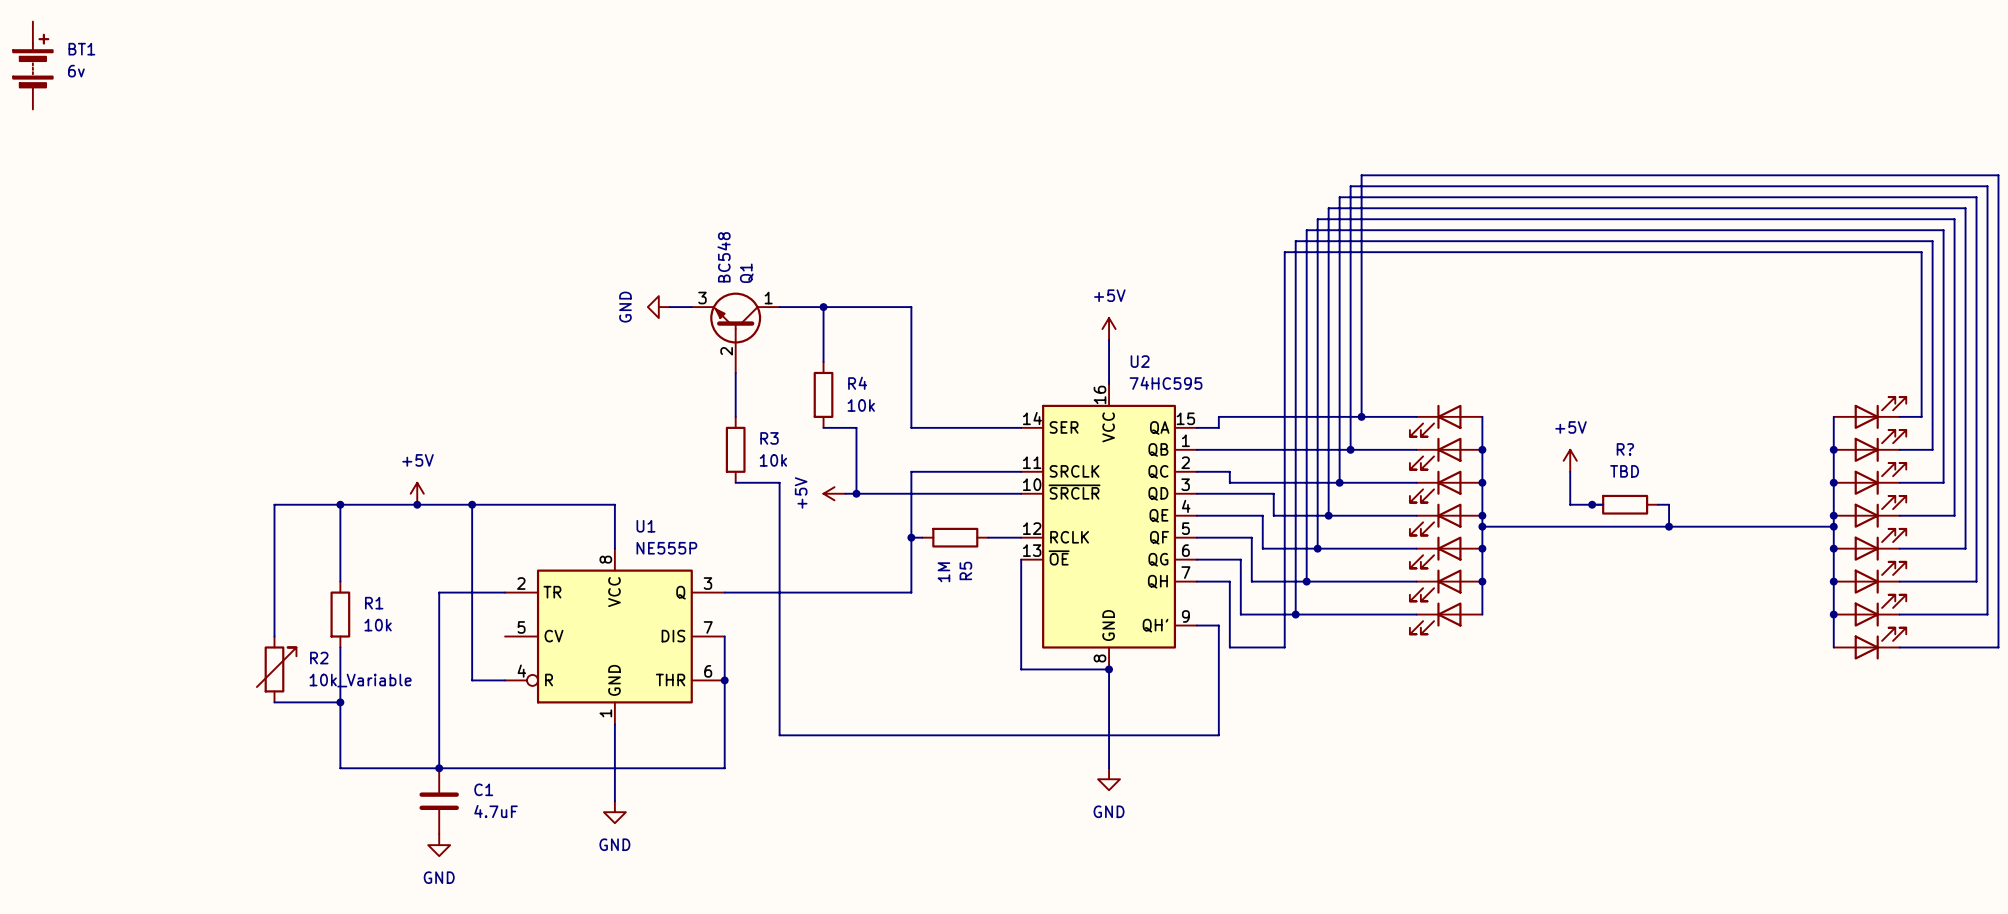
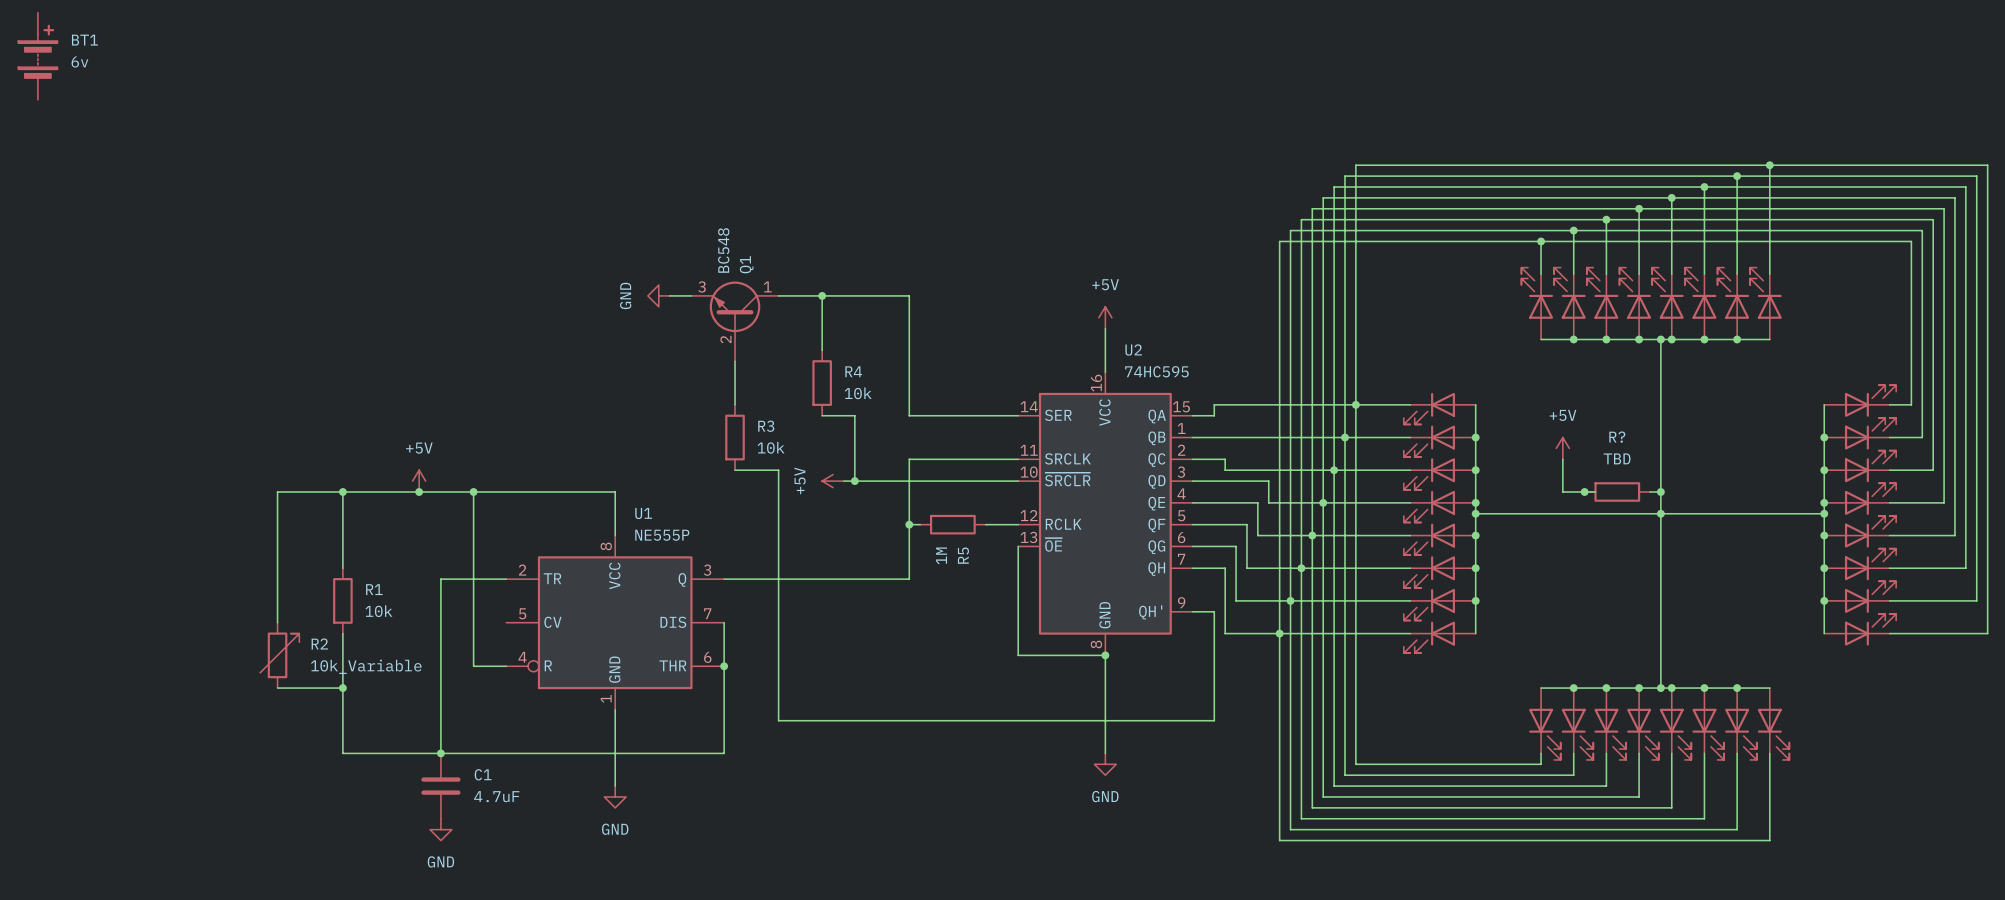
wire: none -> (1769, 165) (1769, 274)
junction: none -> (1769, 165)
wire: none -> (1737, 176) (1737, 274)
junction: none -> (1737, 176)
wire: none -> (1704, 187) (1704, 274)
junction: none -> (1704, 187)
wire: none -> (1671, 197) (1671, 274)
junction: none -> (1671, 197)
wire: none -> (1639, 208) (1639, 274)
junction: none -> (1639, 208)
wire: none -> (1606, 219) (1606, 274)
junction: none -> (1606, 219)
wire: none -> (1573, 230) (1573, 274)
junction: none -> (1573, 230)
wire: none -> (1541, 241) (1541, 274)
junction: none -> (1541, 241)
part: none -> (1537, 303)
part: none -> (1569, 303)
part: none -> (1602, 303)
part: none -> (1635, 303)
part: none -> (1667, 303)
part: none -> (1700, 303)
part: none -> (1733, 303)
part: none -> (1765, 303)
wire: none -> (1541, 339) (1769, 339)
junction: none -> (1573, 339)
junction: none -> (1606, 339)
junction: none -> (1639, 339)
wire: none -> (1660, 339) (1660, 491)
junction: none -> (1660, 339)
junction: none -> (1671, 339)
junction: none -> (1704, 339)
junction: none -> (1737, 339)
wire: none -> (1355, 404) (1355, 764) (1541, 764) (1541, 753)
wire: none -> (1344, 437) (1344, 775) (1573, 775) (1573, 753)
wire: none -> (1334, 470) (1334, 786) (1606, 786) (1606, 753)
junction: none -> (1660, 491)
wire: none -> (1323, 502) (1323, 796) (1639, 796) (1639, 753)
wire: none -> (1660, 513) (1660, 688)
wire: none -> (1312, 535) (1312, 807) (1671, 807) (1671, 753)
wire: none -> (1301, 568) (1301, 818) (1704, 818) (1704, 753)
wire: none -> (1290, 600) (1290, 829) (1737, 829) (1737, 753)
wire: none -> (1475, 600) (1475, 633)
junction: none -> (1475, 600)
junction: none -> (1279, 633)
wire: none -> (1410, 633) (1279, 633) (1279, 840) (1769, 840) (1769, 753)
part: none -> (1439, 637)
wire: none -> (1541, 688) (1769, 688)
junction: none -> (1573, 688)
junction: none -> (1606, 688)
junction: none -> (1639, 688)
junction: none -> (1660, 688)
junction: none -> (1671, 688)
junction: none -> (1704, 688)
junction: none -> (1737, 688)
part: none -> (1544, 724)
part: none -> (1577, 724)
part: none -> (1610, 724)
part: none -> (1642, 724)
part: none -> (1675, 724)
part: none -> (1708, 724)
part: none -> (1740, 724)
part: none -> (1773, 724)

